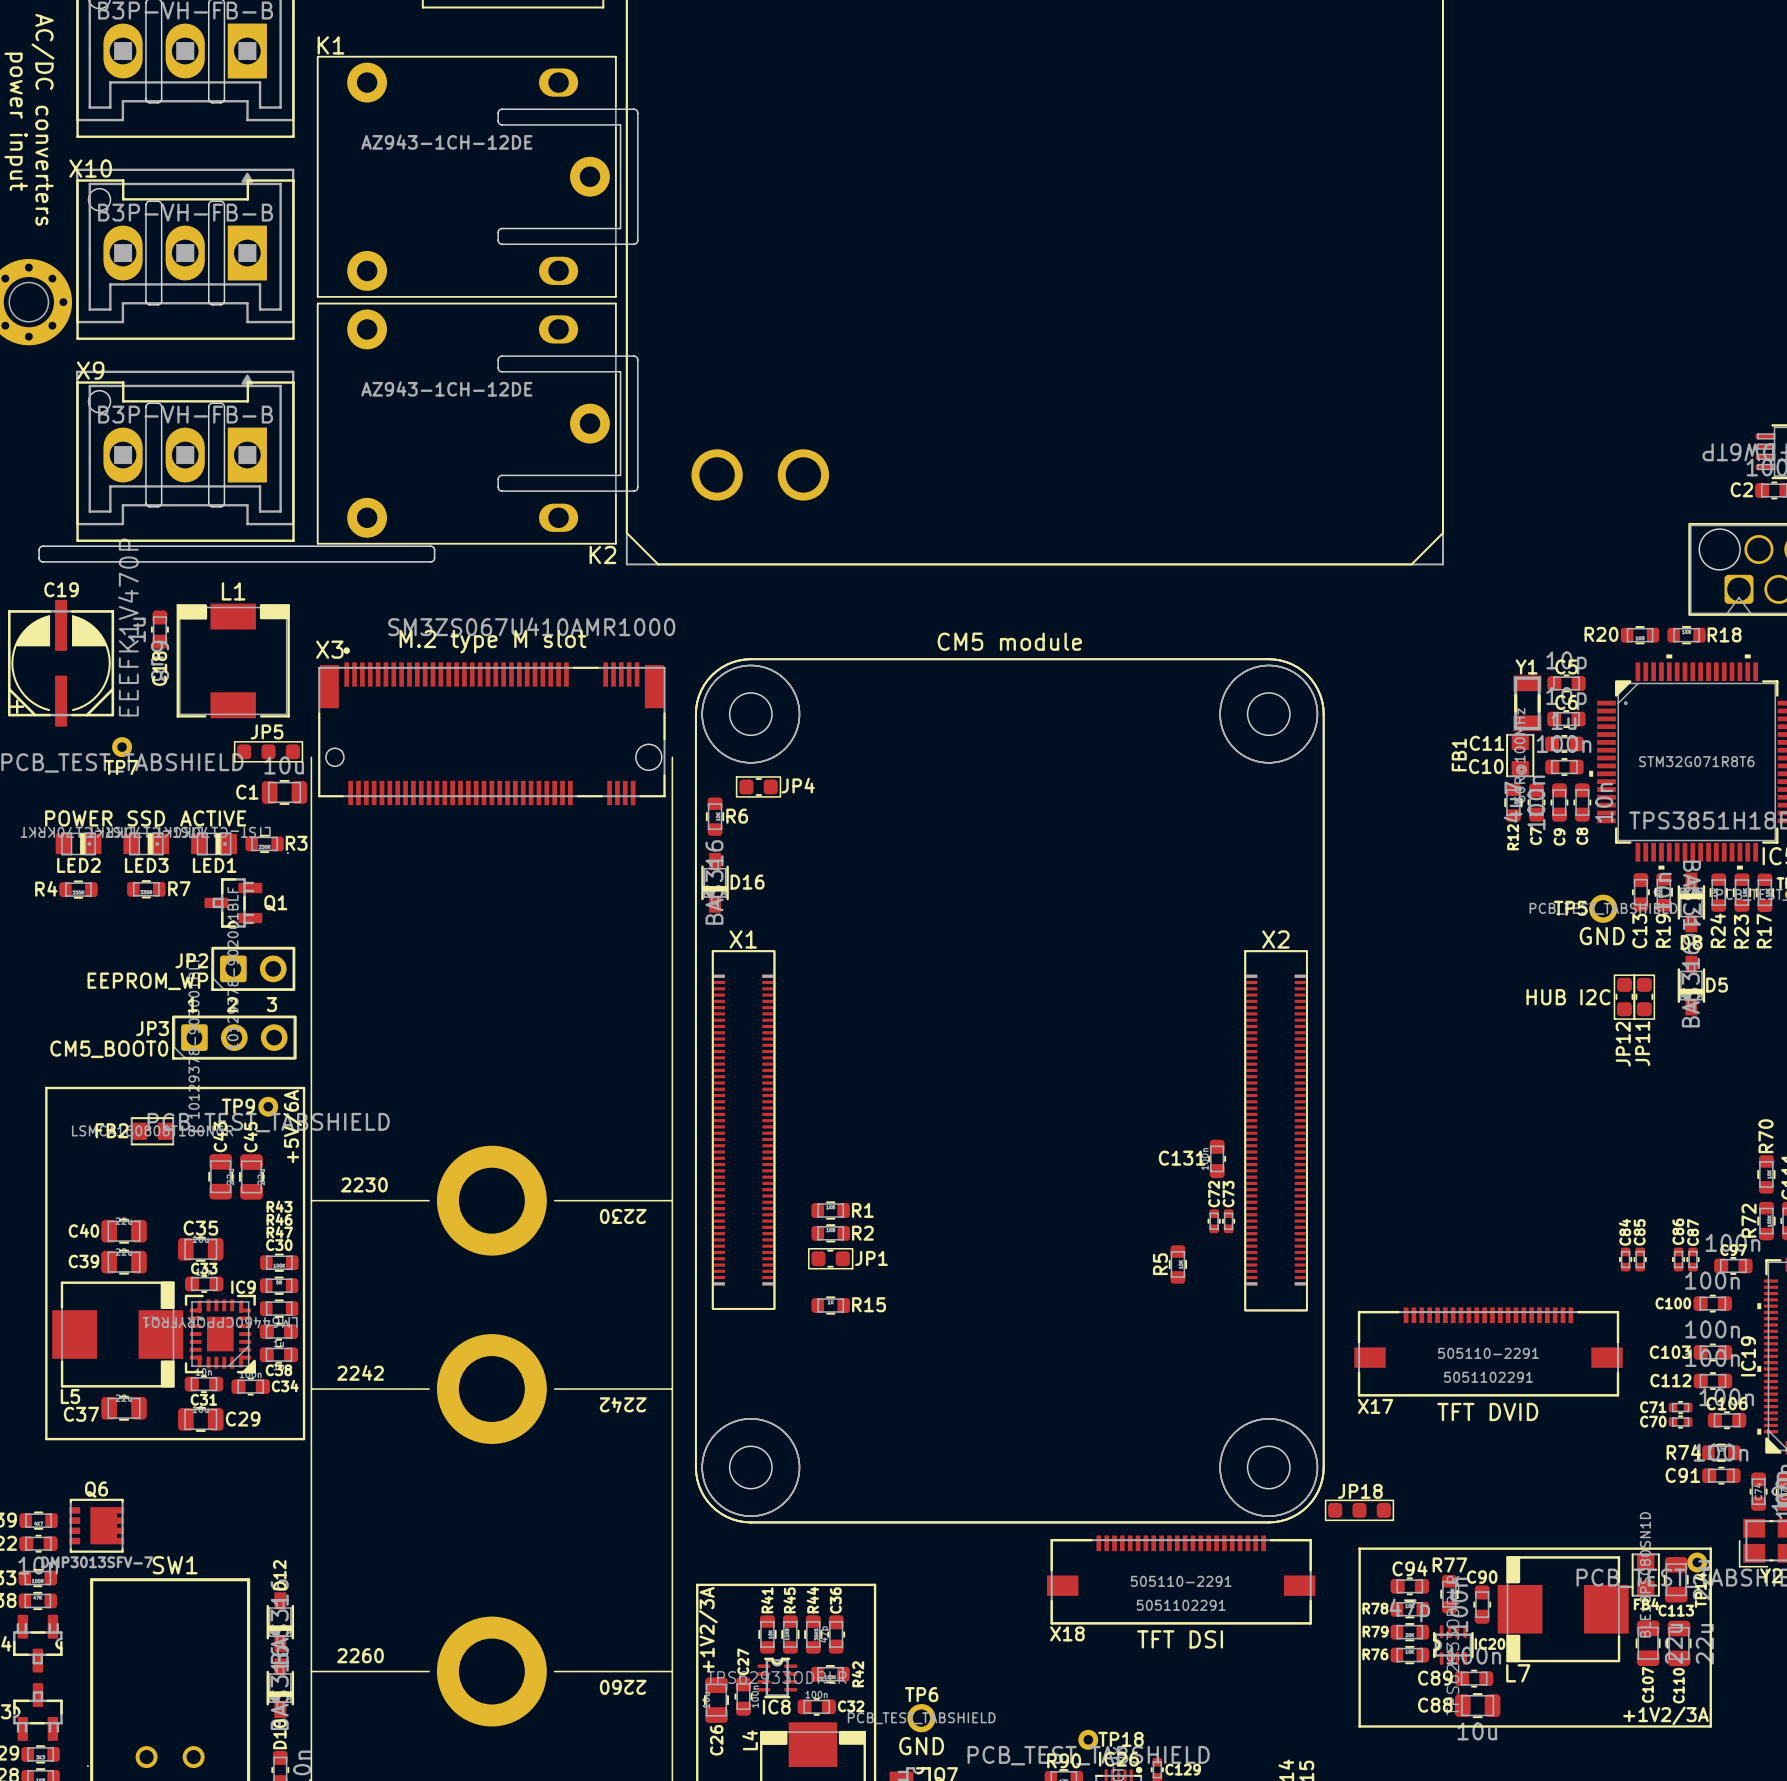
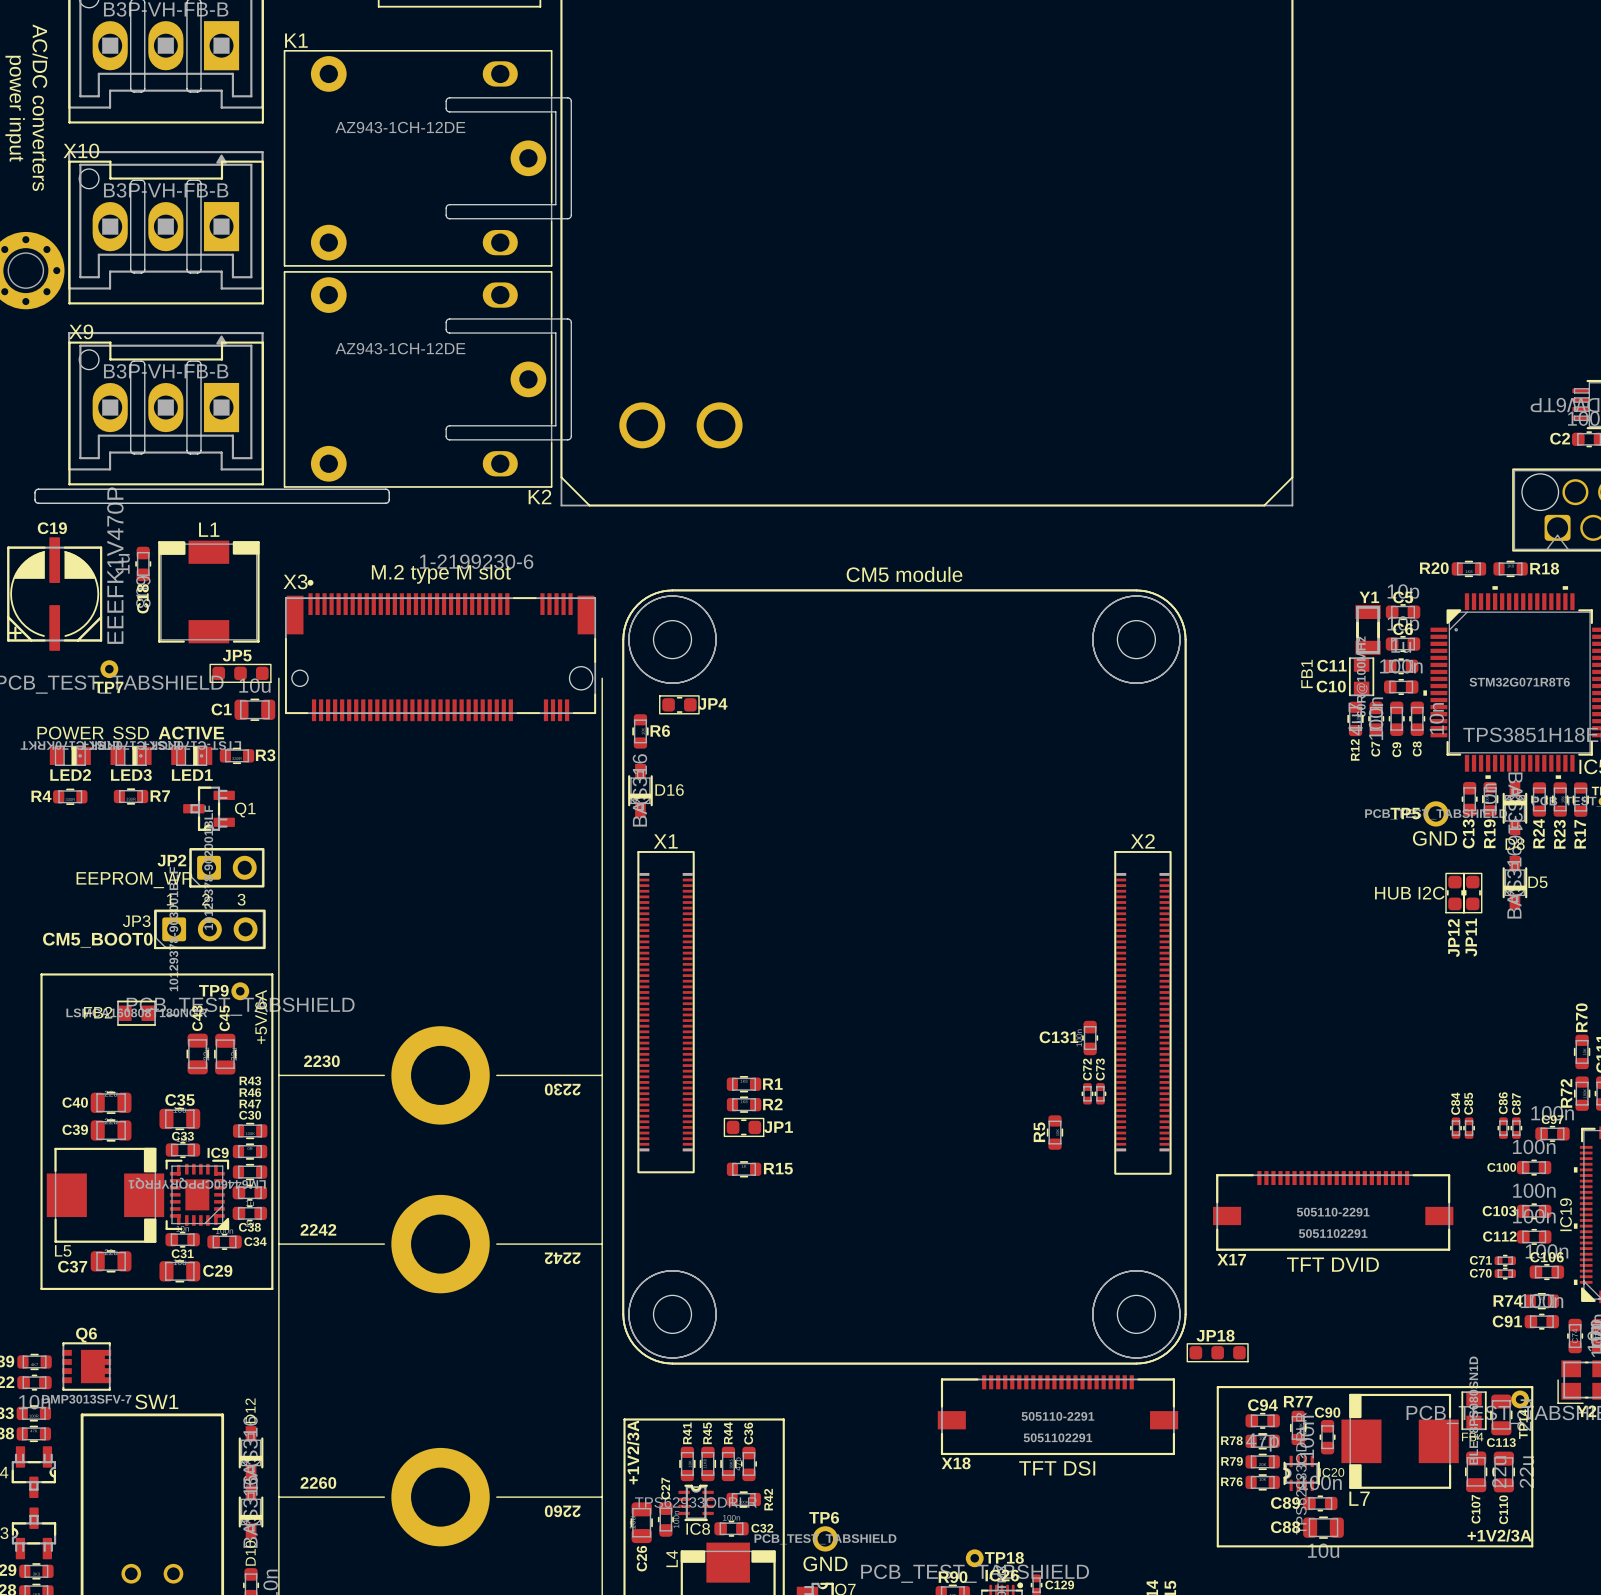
X3 value: SM3ZS067U410AMR1000 (531, 626) -> 1-2199230-6 (476, 561)

